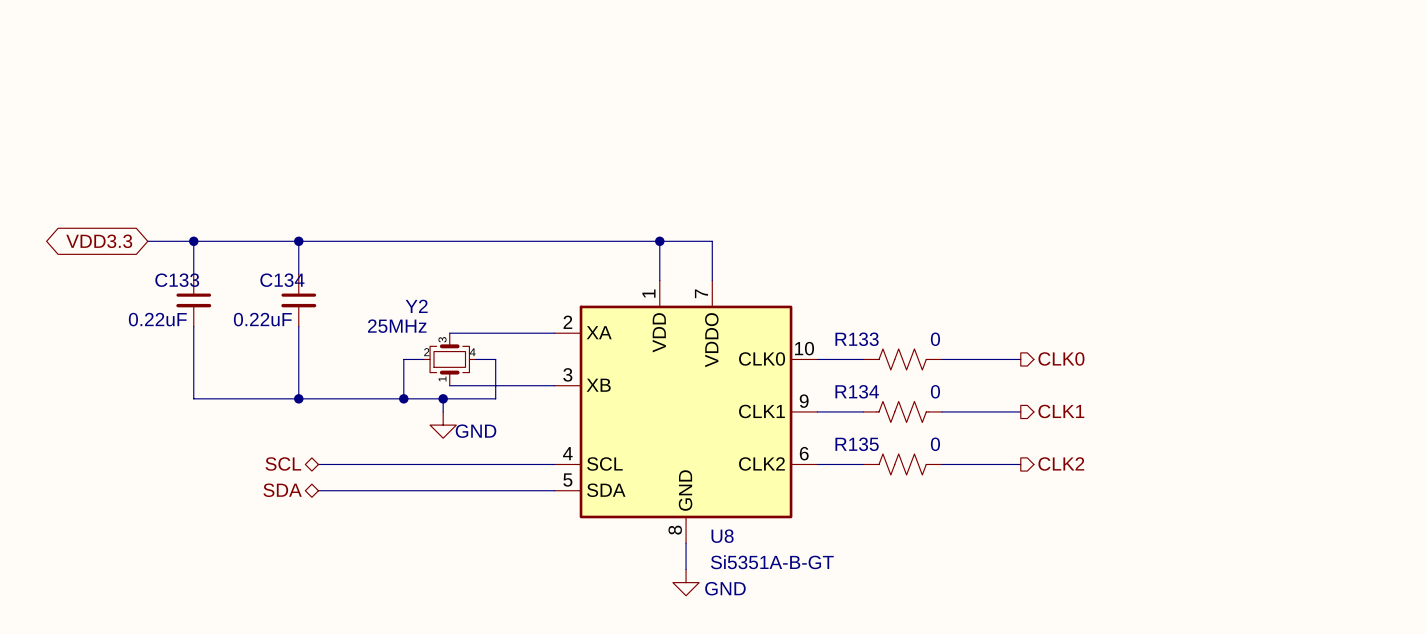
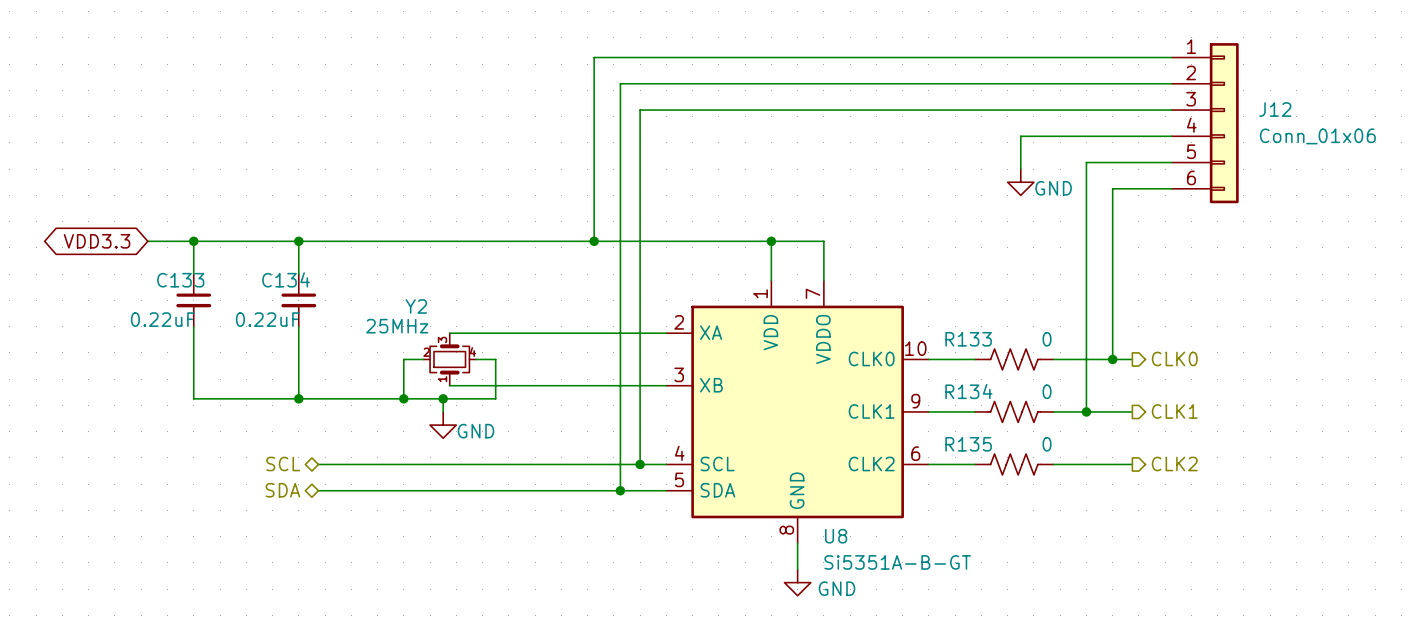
wire: none -> (1171, 57) (594, 57) (594, 241)
wire: none -> (1171, 83) (620, 83) (620, 490)
wire: none -> (1171, 110) (640, 110) (640, 464)
J12: none -> Conn_01x06 (1205, 123)
wire: none -> (1171, 136) (1020, 136) (1020, 169)
wire: none -> (1171, 162) (1086, 162) (1086, 411)
power symbol: none -> GND (1020, 182)
wire: none -> (1171, 188) (1112, 188) (1112, 359)
junction: none -> (594, 241)
wire: (659, 241) (659, 280) -> (771, 241) (771, 280)
junction: (659, 241) -> none
wire: (712, 241) (712, 280) -> (712, 241) (823, 241) (823, 280)
junction: none -> (771, 241)
hierarchical label position: CLK0 (1061, 358) -> CLK0 (1174, 358)
R133 position: (902, 359) -> (1014, 359)
wire: (974, 359) (1020, 359) -> none
wire: none -> (1053, 359) (1132, 359)
junction: none -> (1112, 359)
U8 position: (686, 411) -> (797, 411)
R134 position: (902, 411) -> (1014, 411)
wire: (974, 411) (1020, 411) -> none
wire: none -> (1053, 411) (1132, 411)
hierarchical label position: CLK1 (1061, 411) -> CLK1 (1174, 411)
junction: none -> (1086, 411)
hierarchical label position: CLK2 (1061, 463) -> CLK2 (1174, 463)
junction: none -> (640, 464)
R135 position: (902, 464) -> (1014, 464)
wire: (974, 464) (1020, 464) -> none
wire: none -> (1053, 464) (1132, 464)
junction: none -> (620, 490)
wire: (686, 543) (686, 569) -> (797, 543) (797, 569)
power symbol position: GND (686, 582) -> GND (797, 582)

